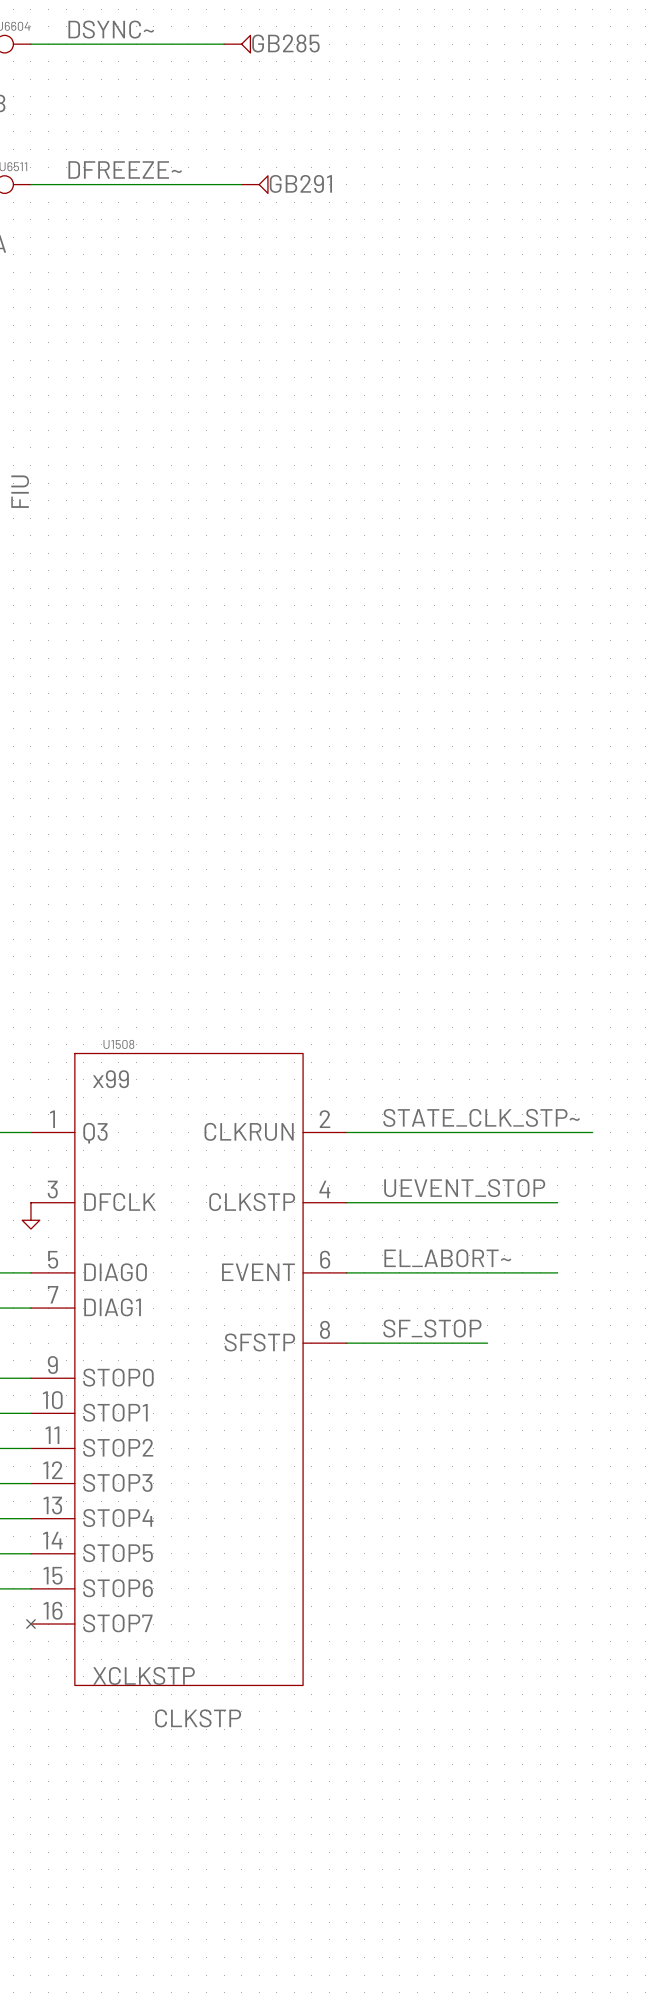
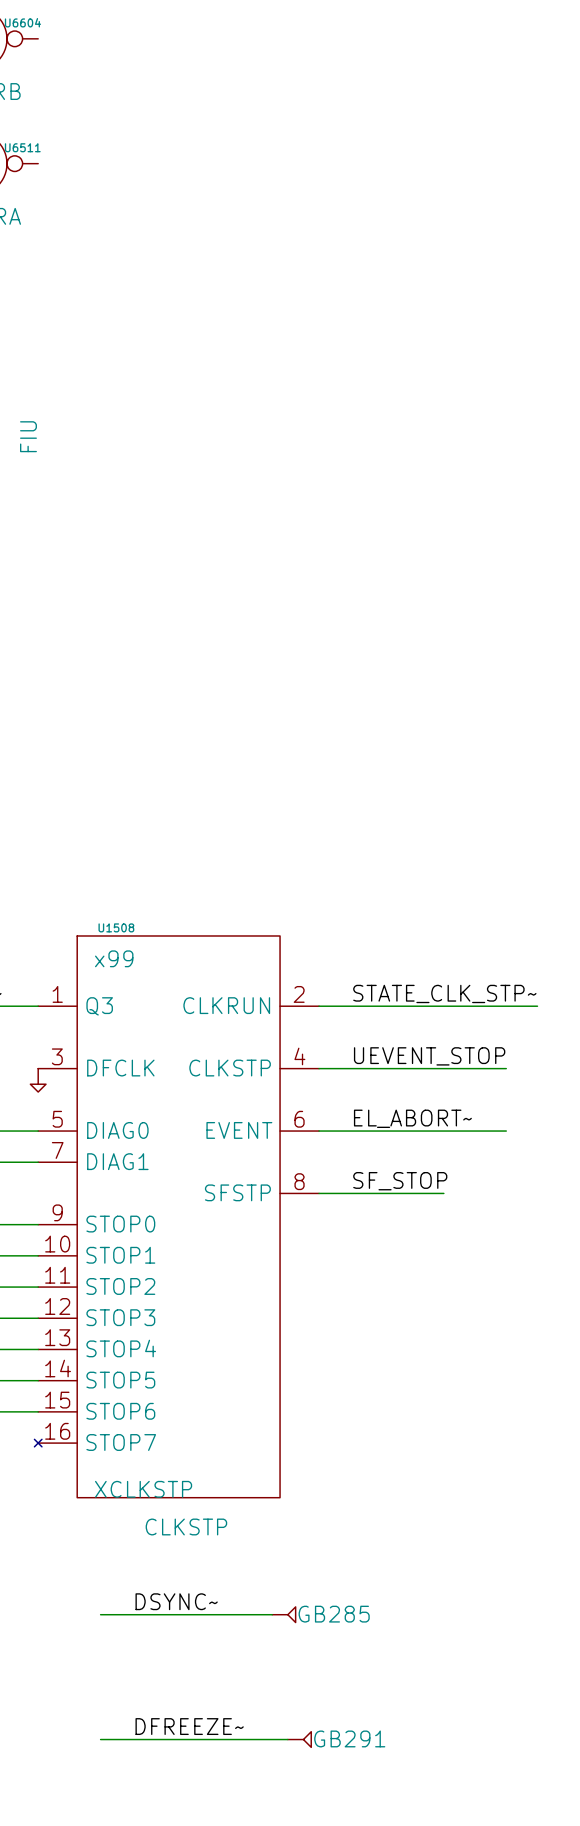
label: DSYNC~ (111, 29) -> none
wire: (30, 44) (224, 44) -> none
GB285 position: (237, 44) -> (284, 1614)
label: DFREEZE~ (125, 169) -> none
wire: (30, 184) (241, 184) -> none
GB291 position: (255, 184) -> (299, 1739)
label: none -> DSYNC~ (176, 1601)
wire: none -> (100, 1614) (272, 1614)
label: none -> DFREEZE~ (189, 1726)
wire: none -> (100, 1739) (287, 1739)

